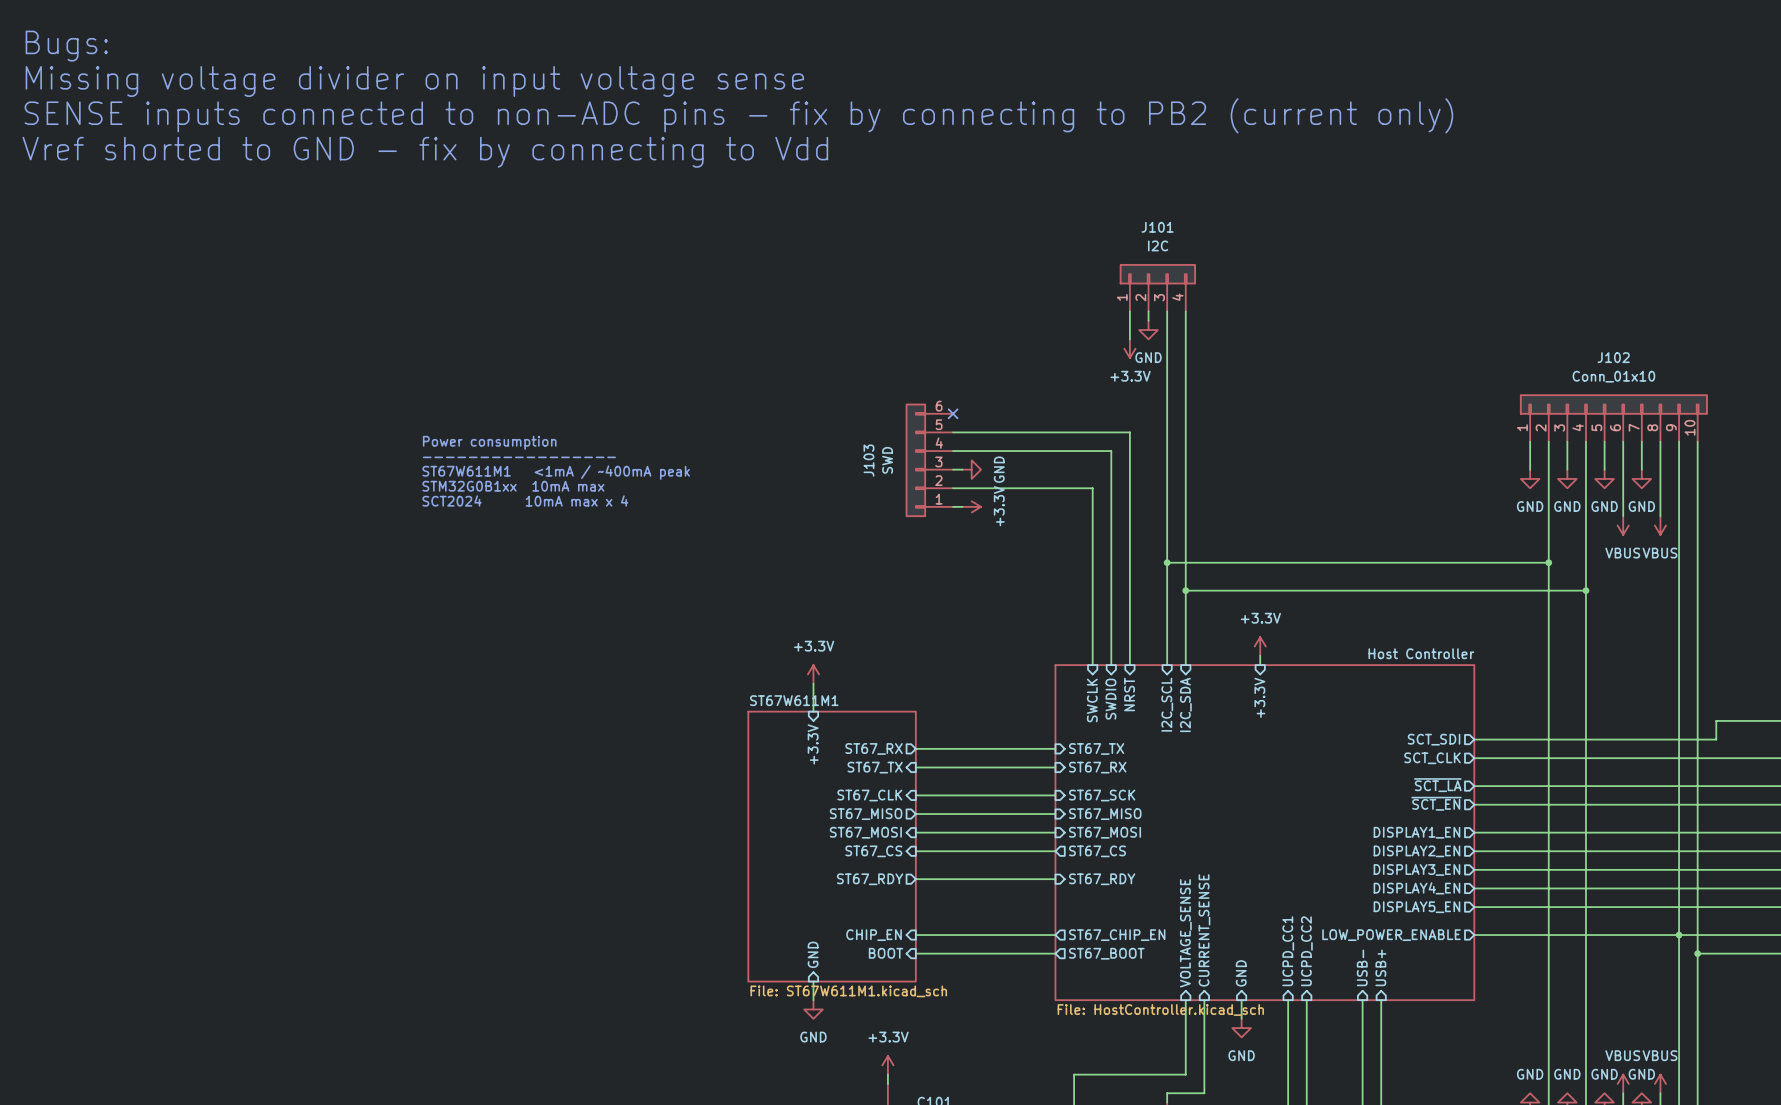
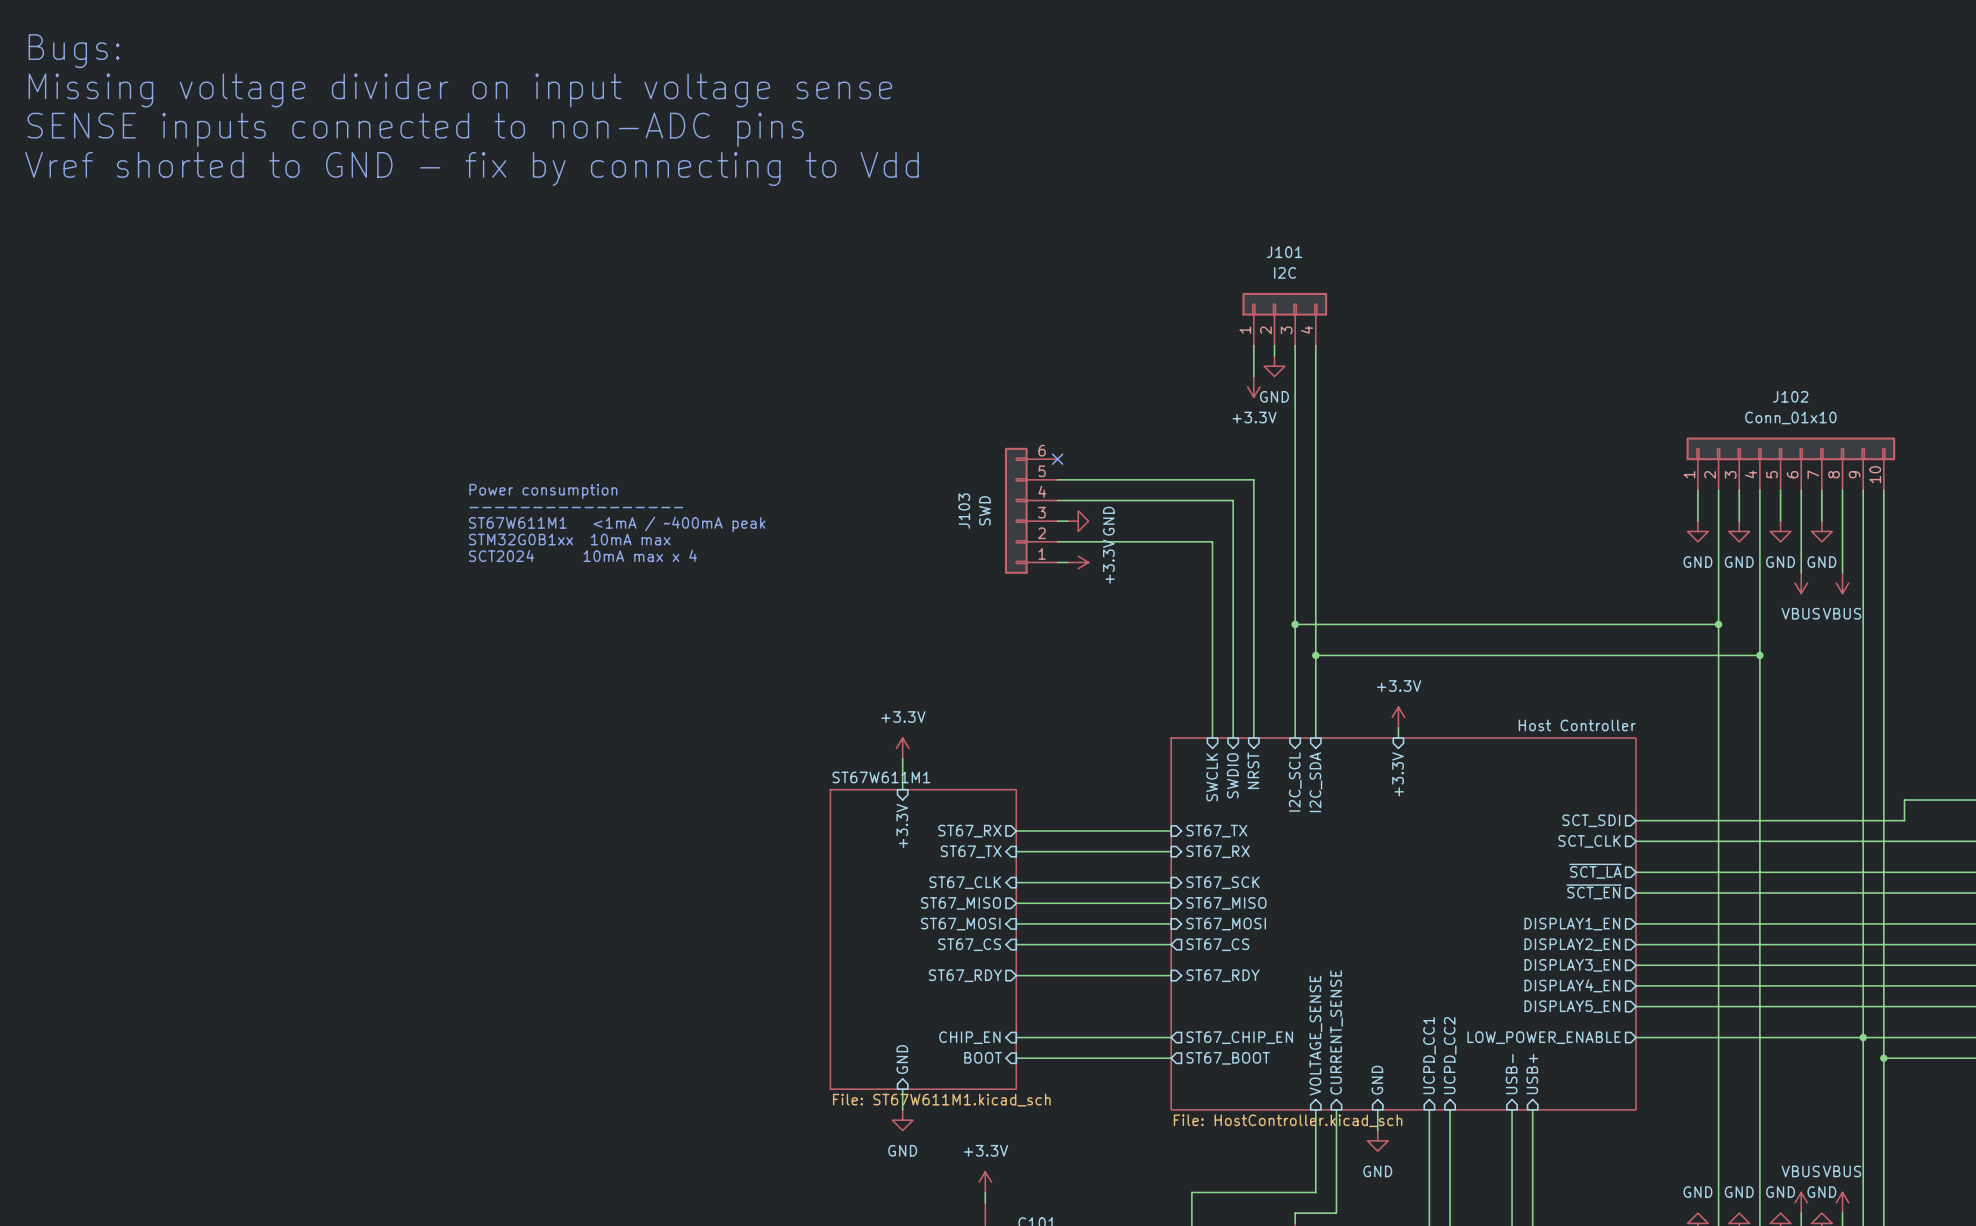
text: SENSE inputs connected to non-ADC pins - fix by connecting to PB2 (current only) (738, 115) -> SENSE inputs connected to non-ADC pins (415, 129)

